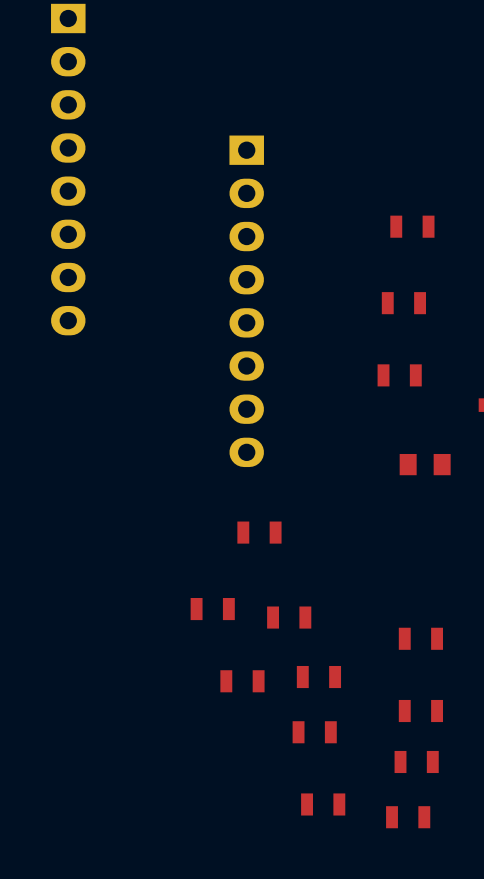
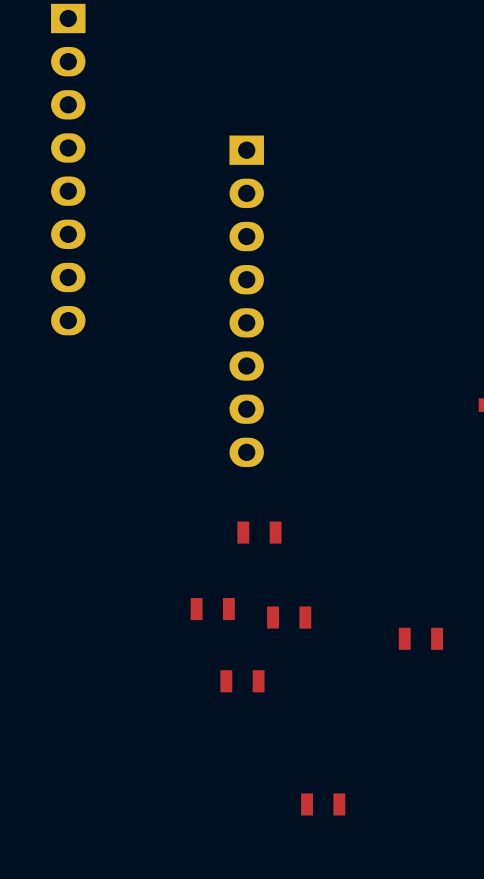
part: (412, 226) -> none
part: (403, 303) -> none
part: (399, 375) -> none
part: (425, 464) -> none
part: (318, 677) -> none
part: (420, 711) -> none
part: (314, 732) -> none
part: (416, 761) -> none
part: (408, 817) -> none

